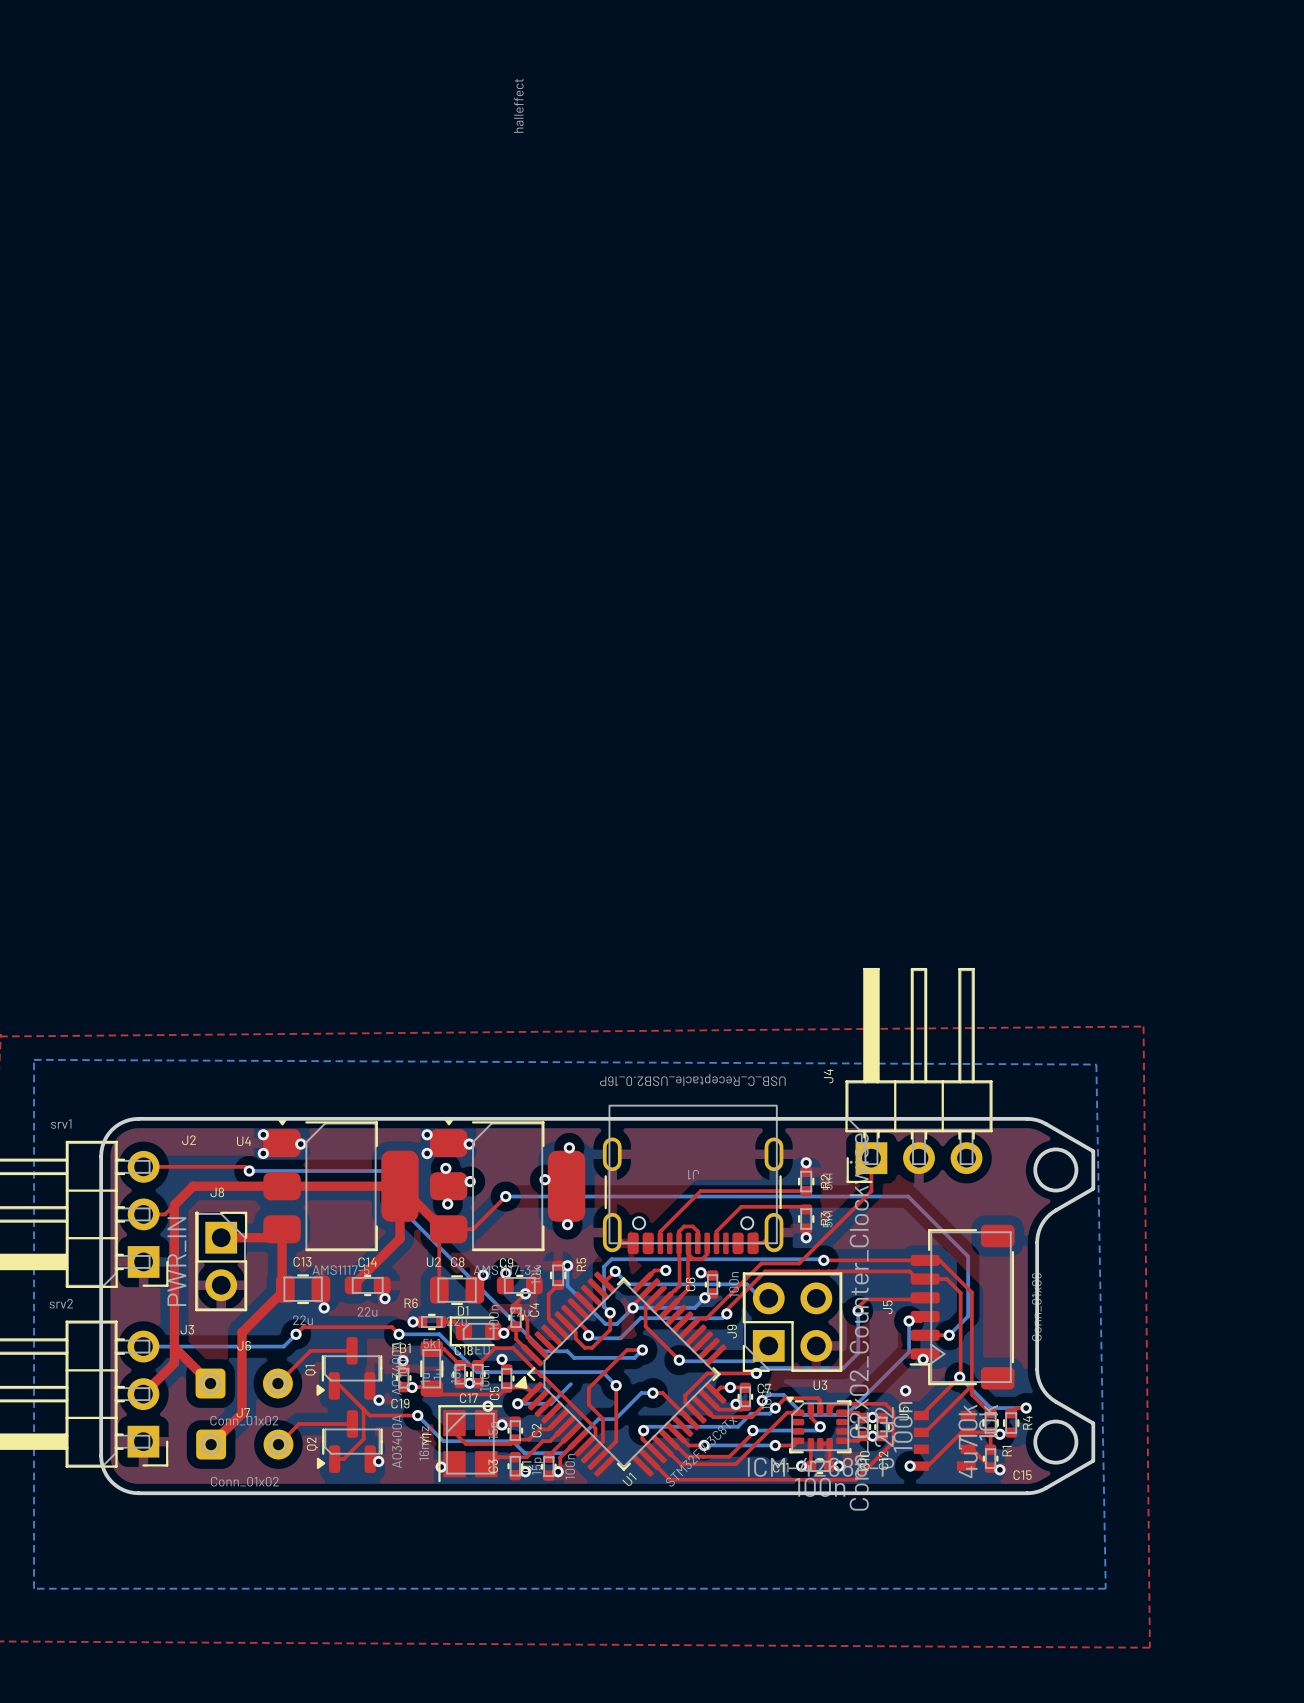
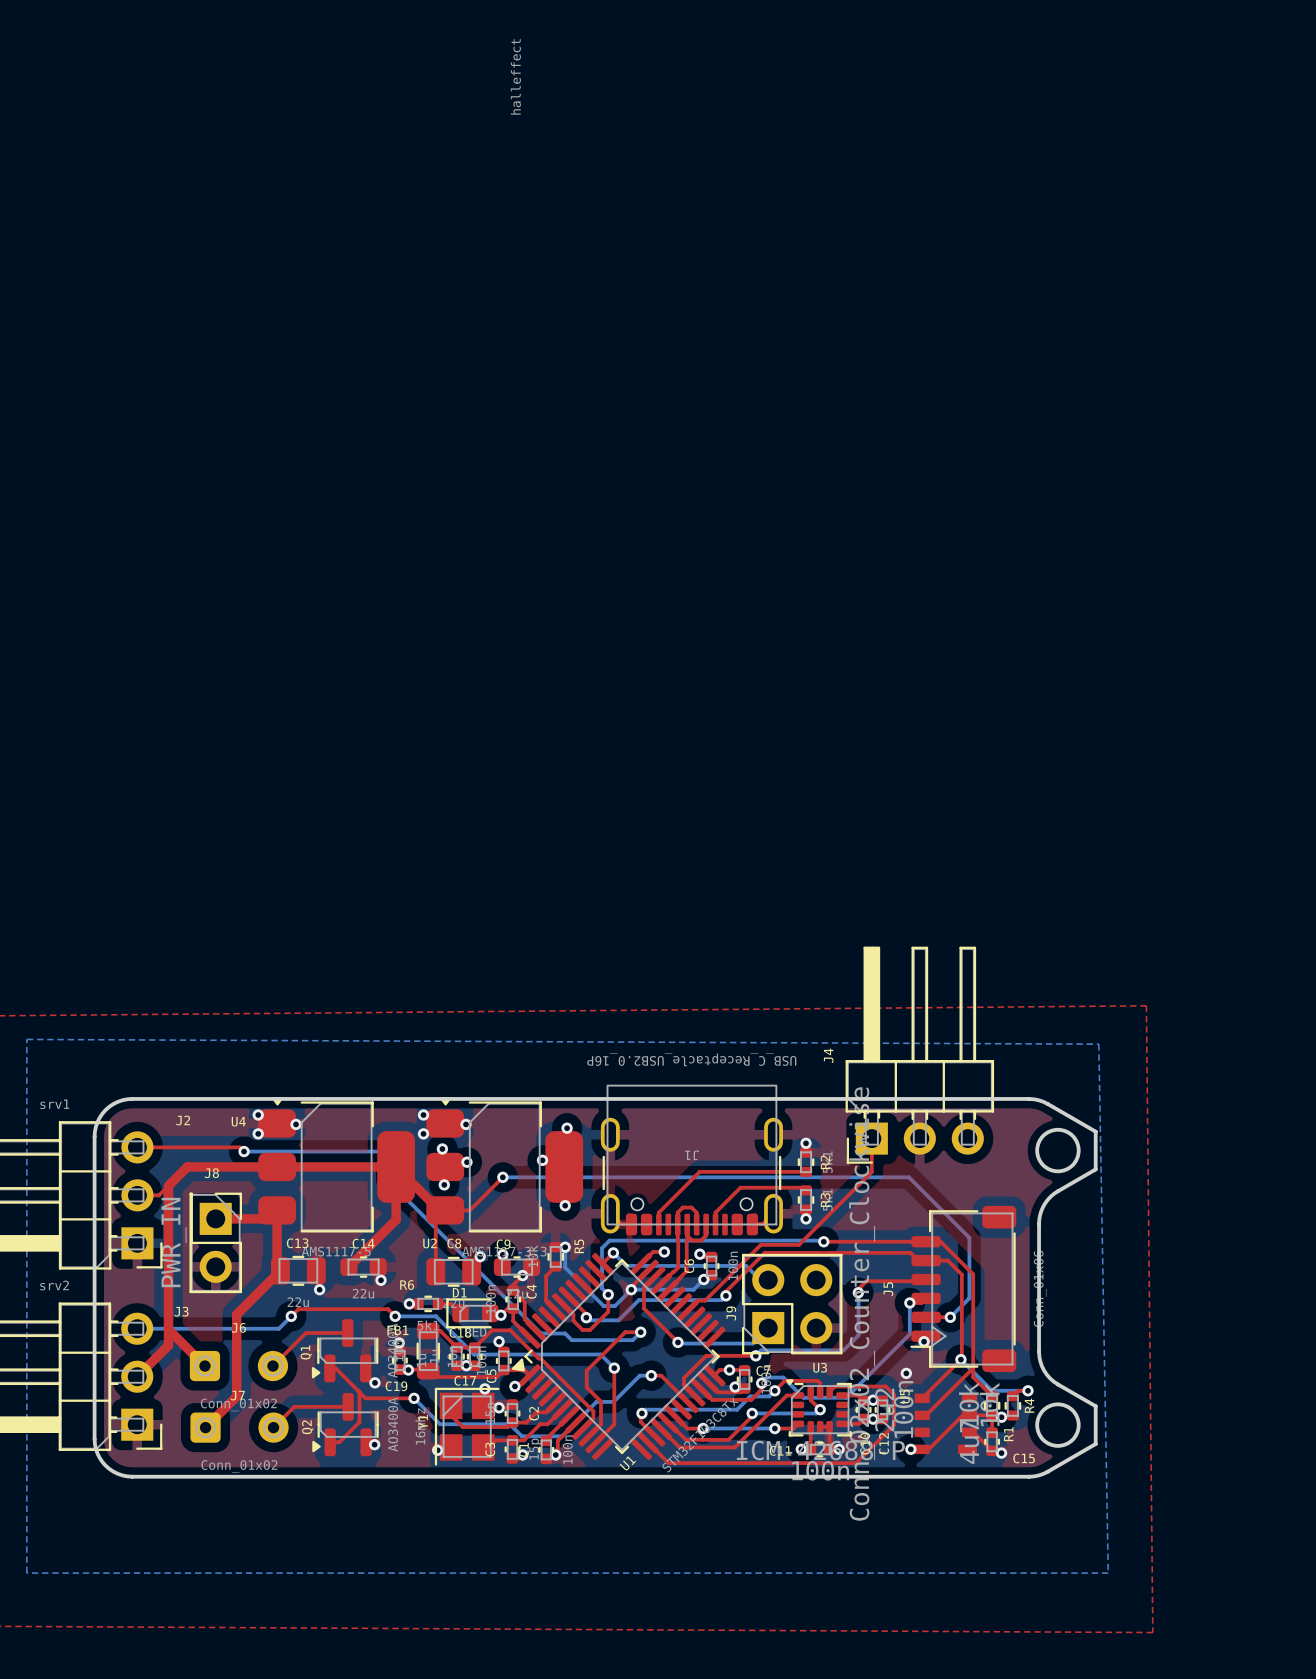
bottom track: (570, 1384) (551, 1403) (517, 1403) -> none

